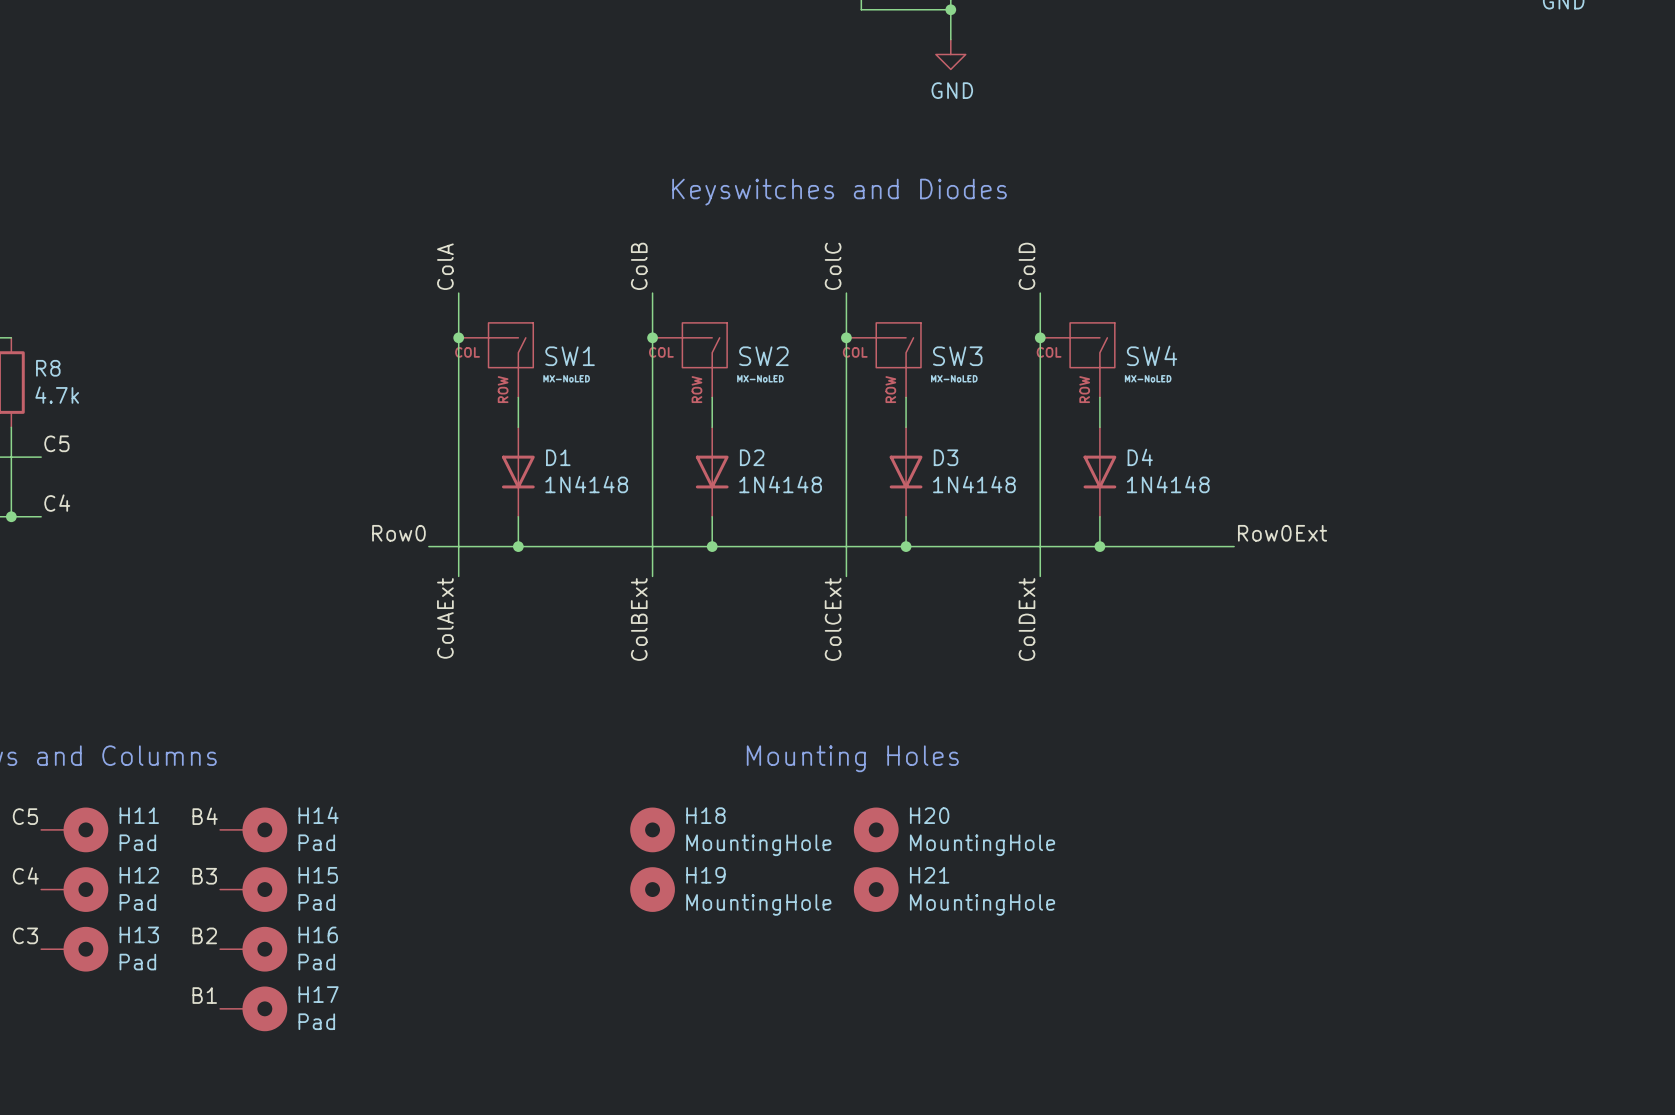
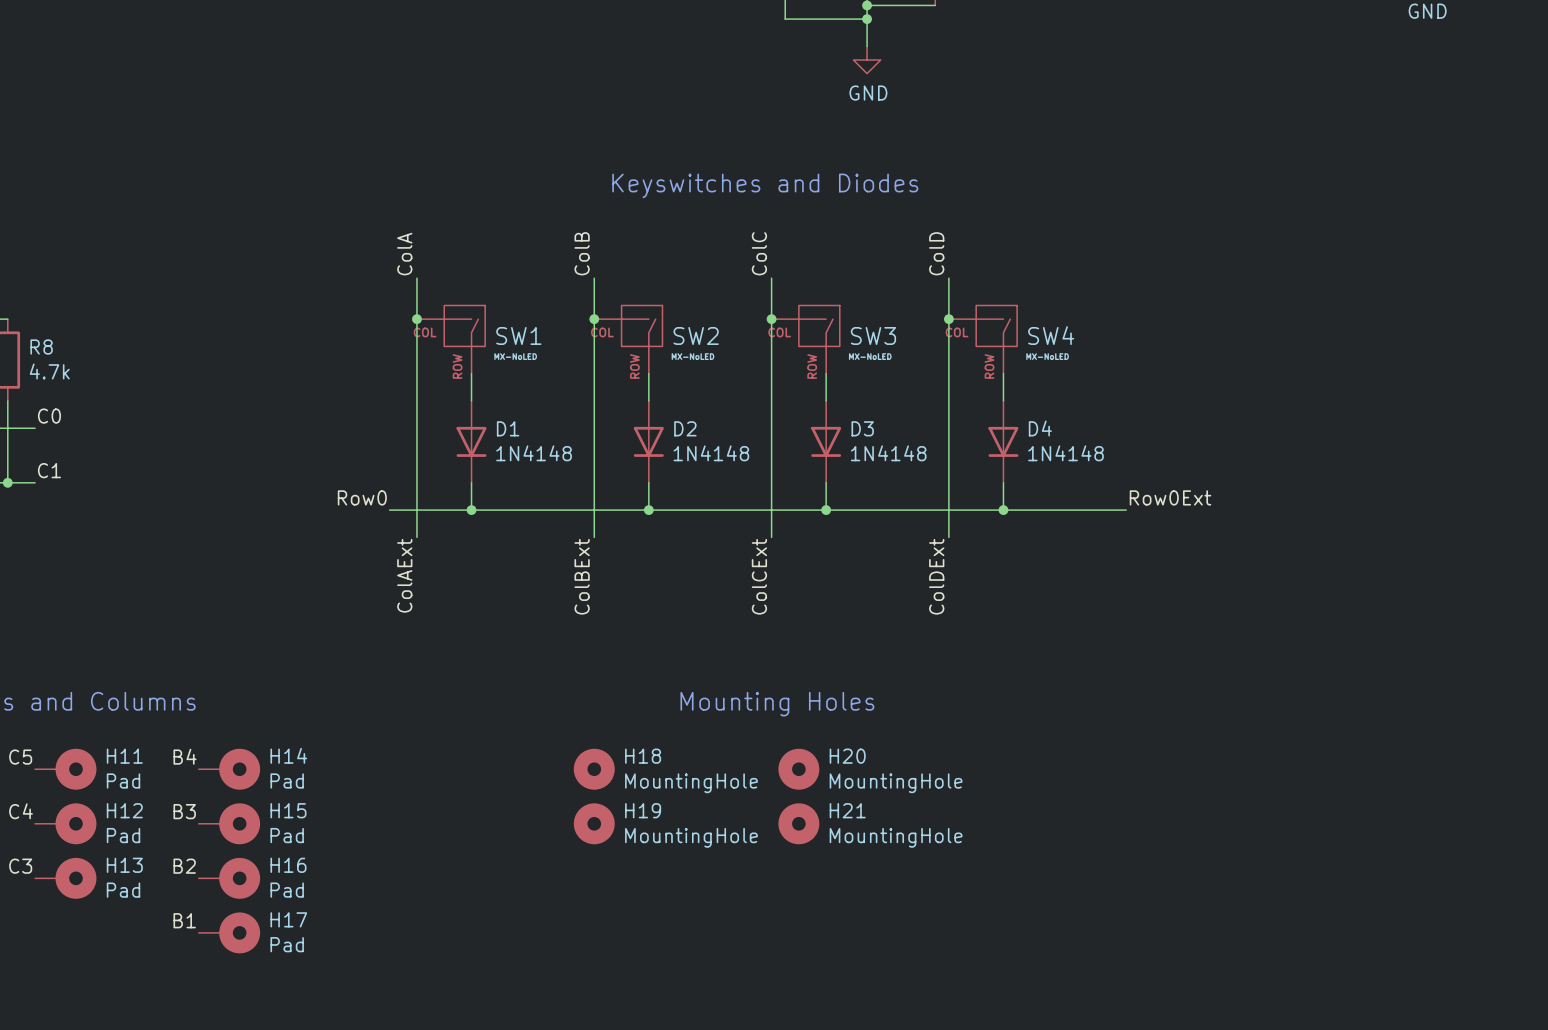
label: C5 (56, 443) -> C0 (49, 416)
label: C4 (57, 503) -> C1 (49, 470)

